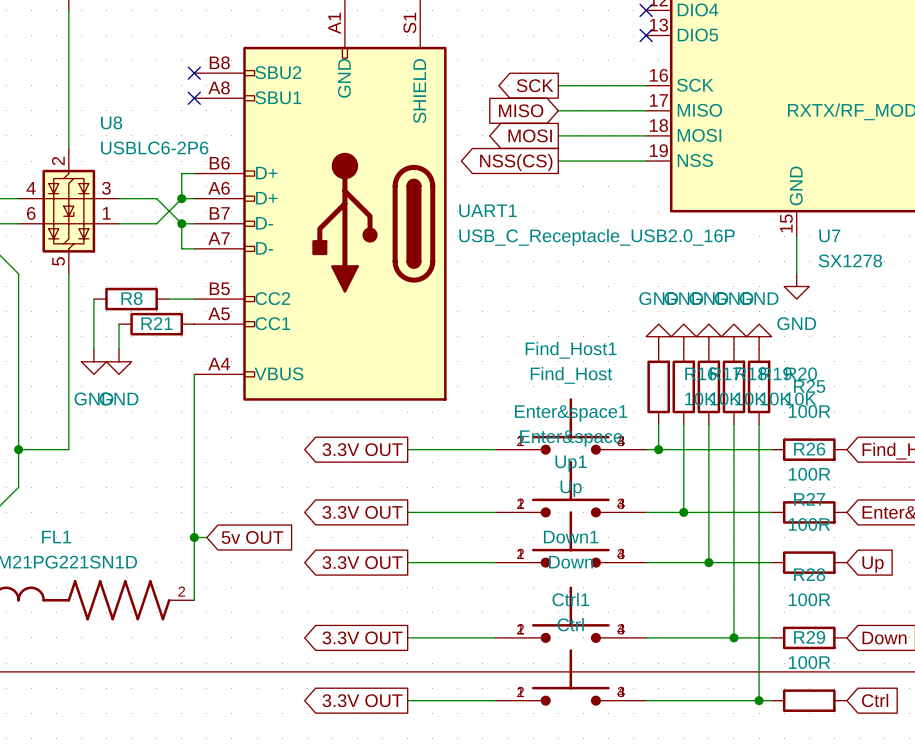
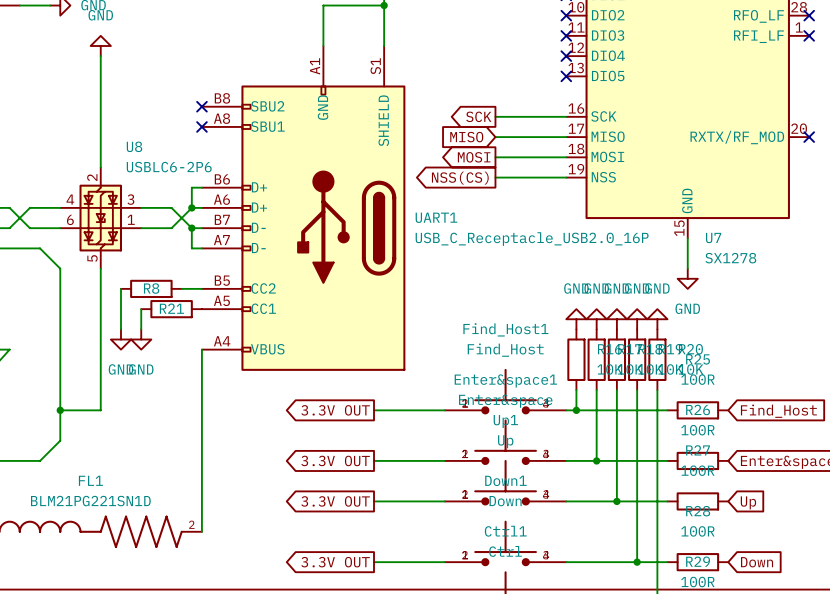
wire: (194, 537) (206, 537) -> none
junction: (194, 537) -> none
global label: 5v OUT (252, 537) -> none

